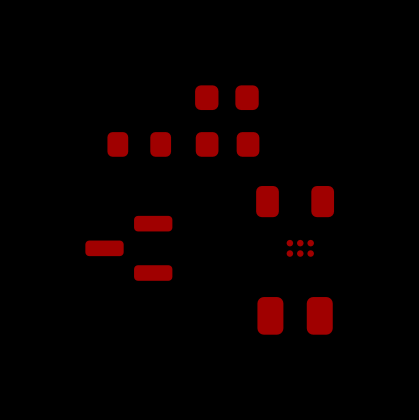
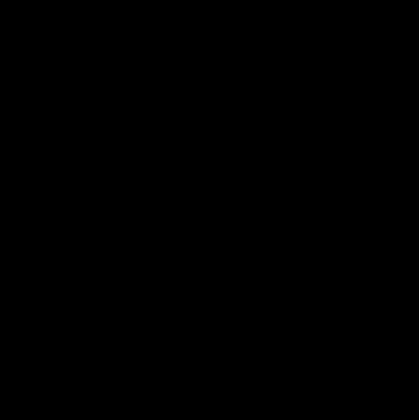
part: (226, 97) -> none
part: (139, 144) -> none
part: (227, 144) -> none
part: (295, 201) -> none
part: (128, 248) -> none
part: (300, 248) -> none
part: (295, 315) -> none

